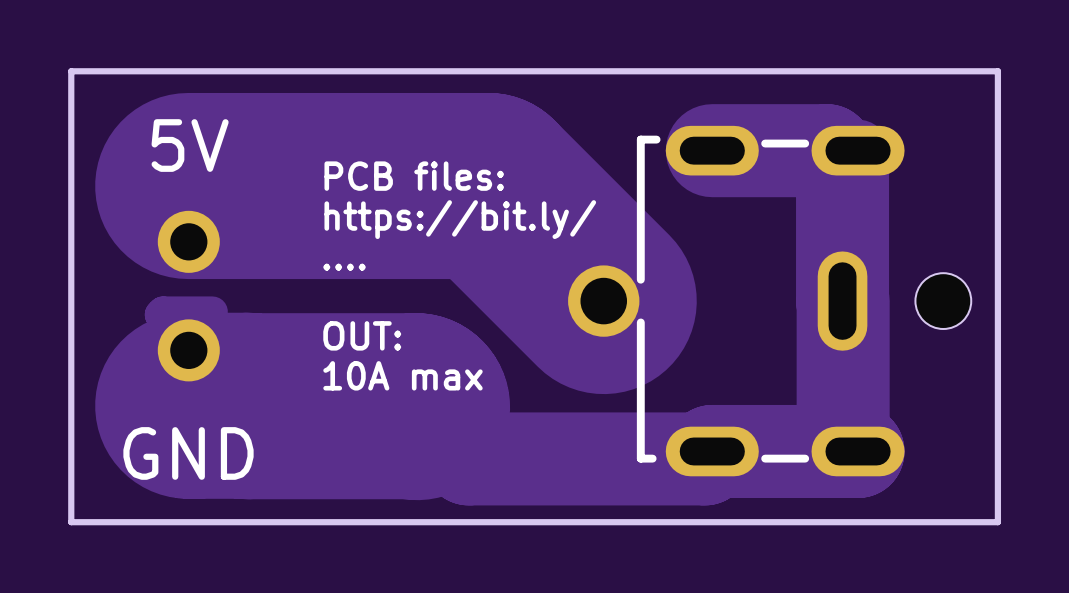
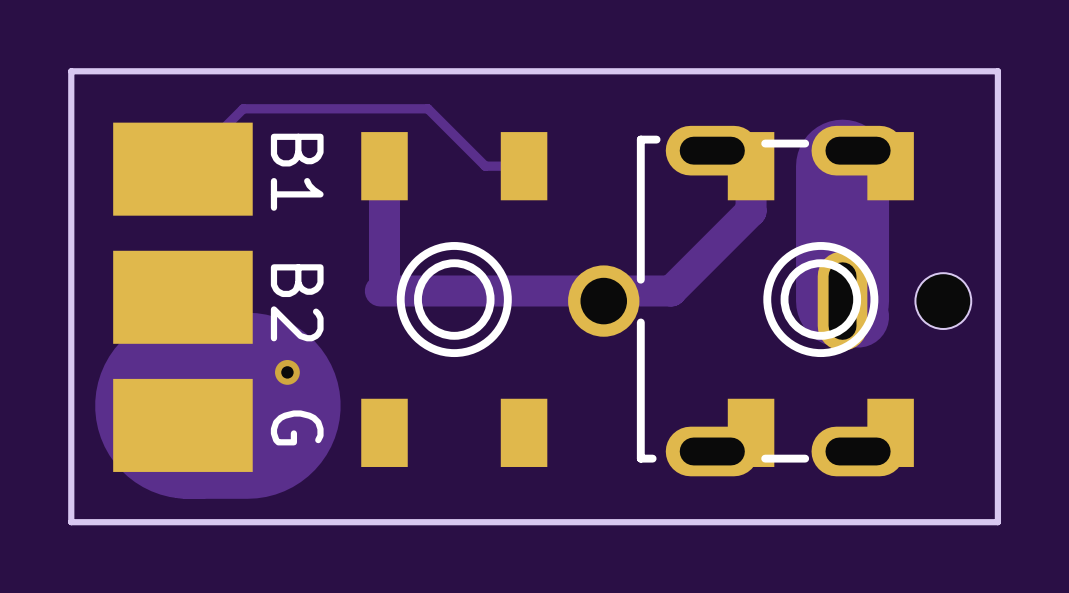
text: 5V (190, 145) -> none
track: (712, 150) (827, 150) (842, 166) (858, 150) -> none
track: none -> (384, 166) (384, 286) (380, 290) (671, 290) (751, 211) (751, 166)
track: none -> (524, 166) (485, 166) (427, 108) (243, 108) (182, 169)
part: none -> (182, 169)
text: PCB files: (414, 176) -> B1 (297, 172)
track: (188, 186) (488, 186) (603, 301) -> none
part footprint: [157, 210, 220, 382] -> [113, 250, 253, 344]
text: https://bit.ly/ (460, 219) -> none
text: .... (344, 267) -> none
part: none -> (454, 299)
part: none -> (820, 299)
track: (843, 301) (843, 436) (858, 451) (712, 451) (704, 458) (468, 458) (416, 406) (248, 406) -> none
text: none -> B2 (297, 302)
text: OUT: (362, 335) -> none
via: none -> (287, 372)
text: 10A max (402, 375) -> none
part: none -> (182, 425)
text: none -> G (297, 427)
text: GND (188, 453) -> none

